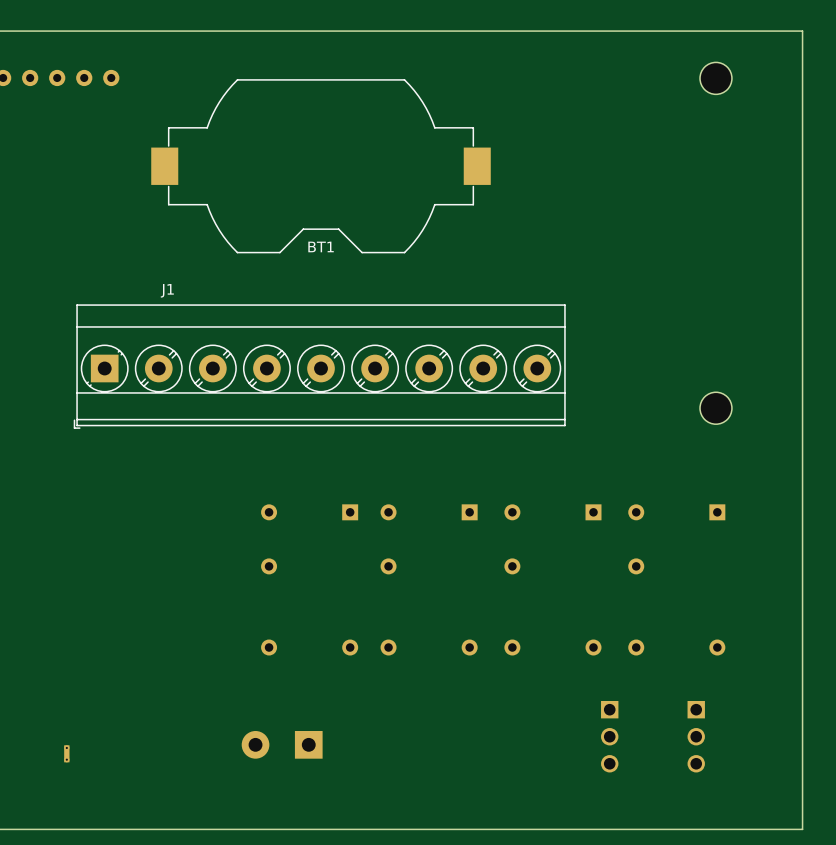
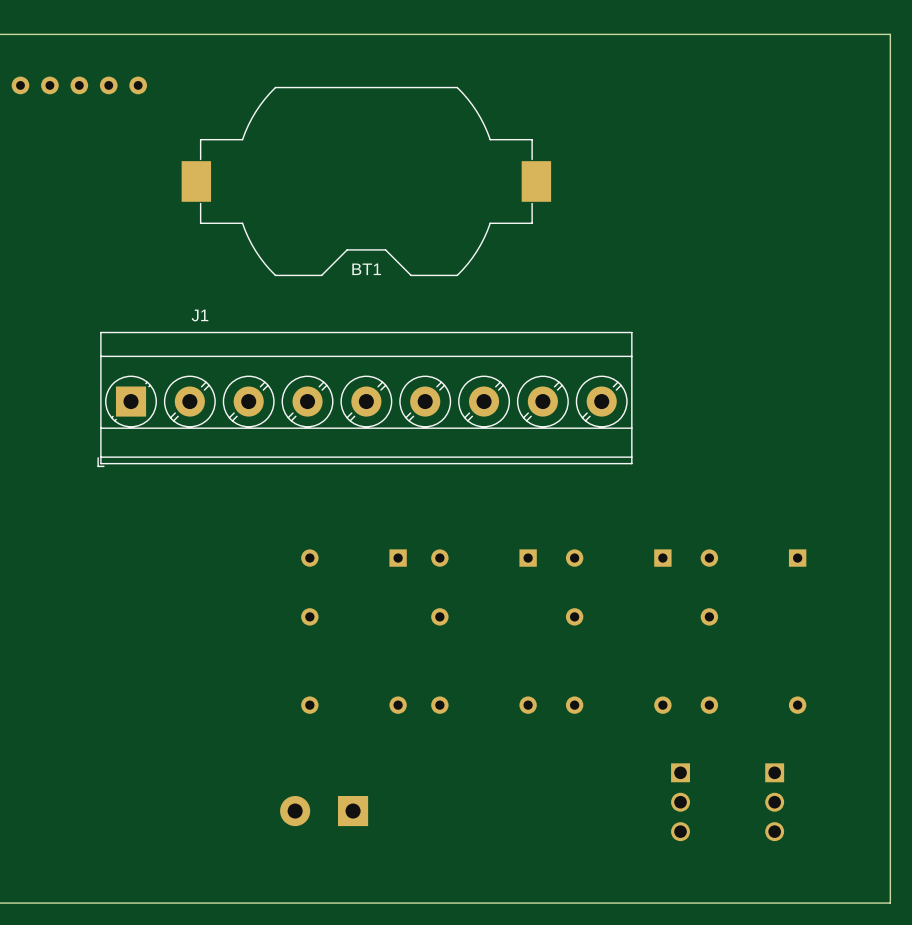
part: (715, 78) -> none
part: (715, 408) -> none
part: (66, 753) -> none

